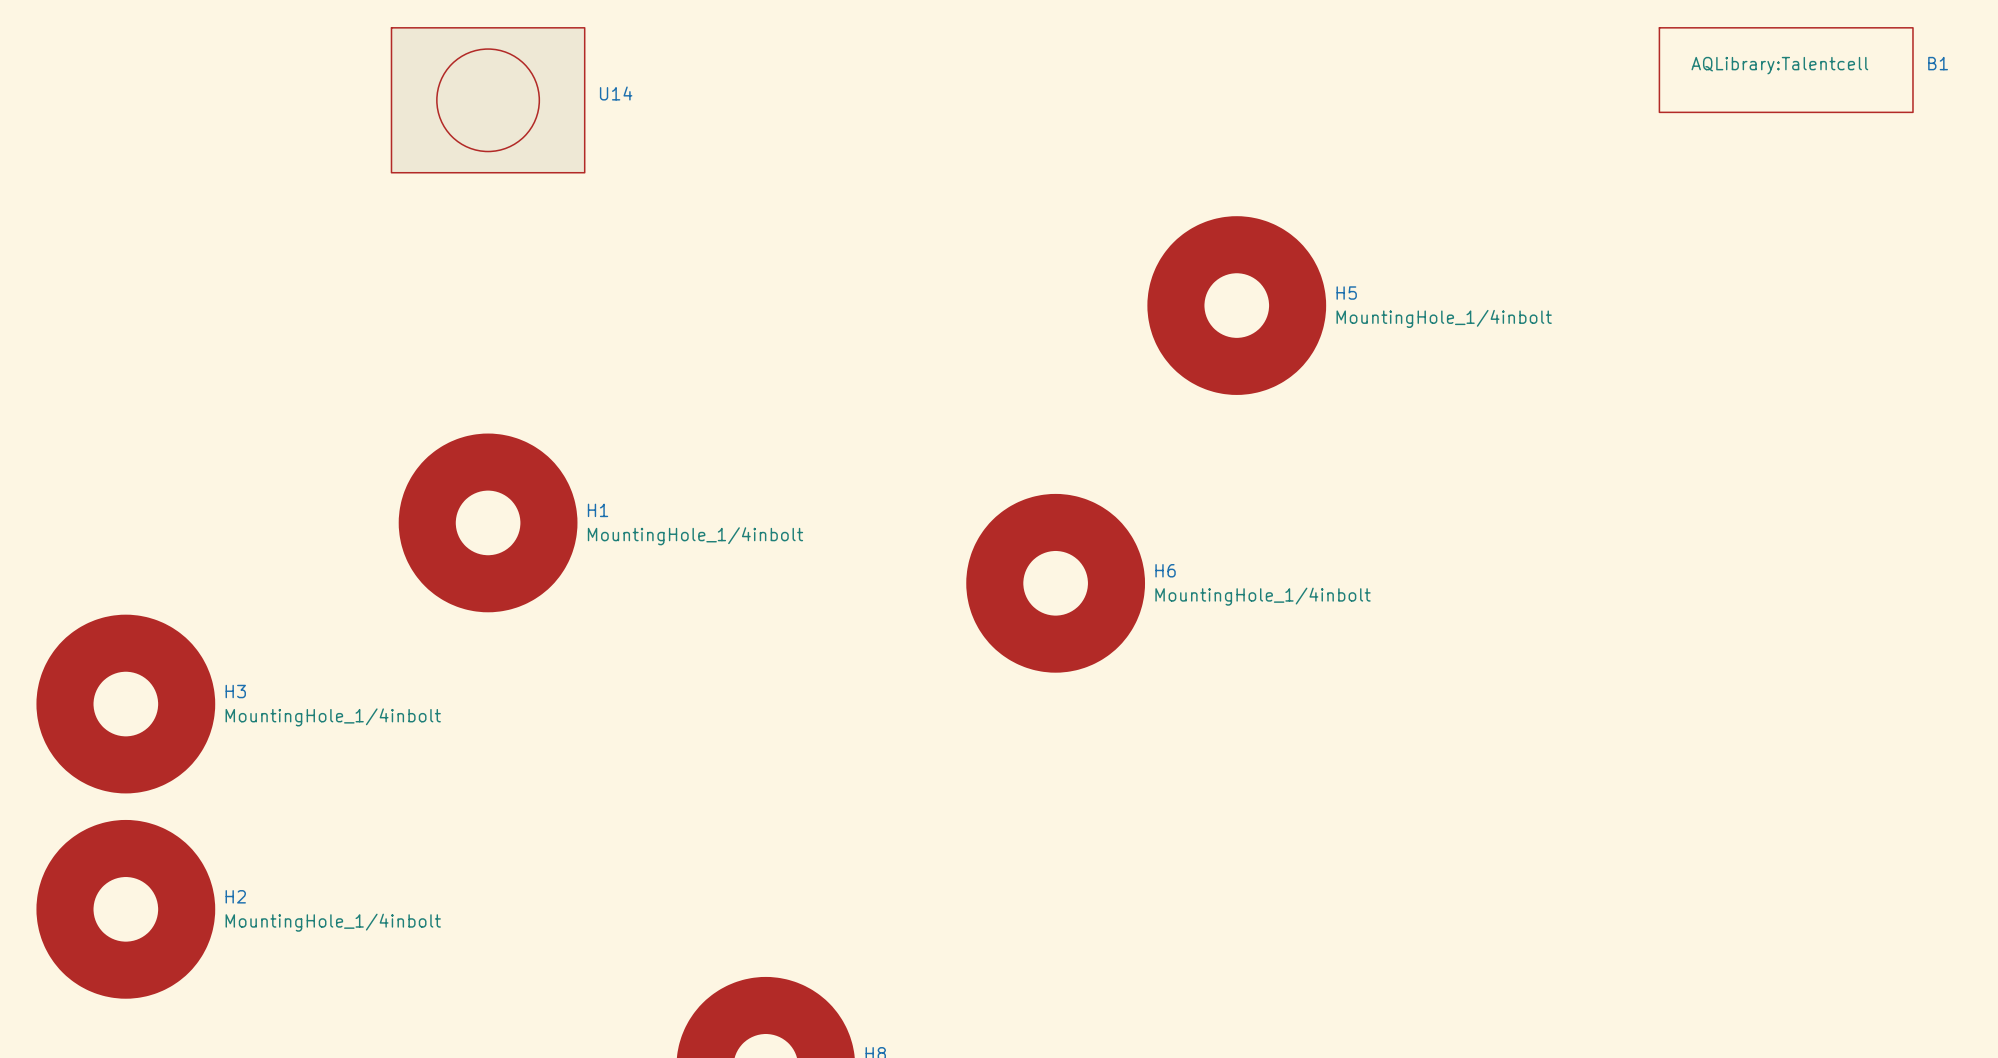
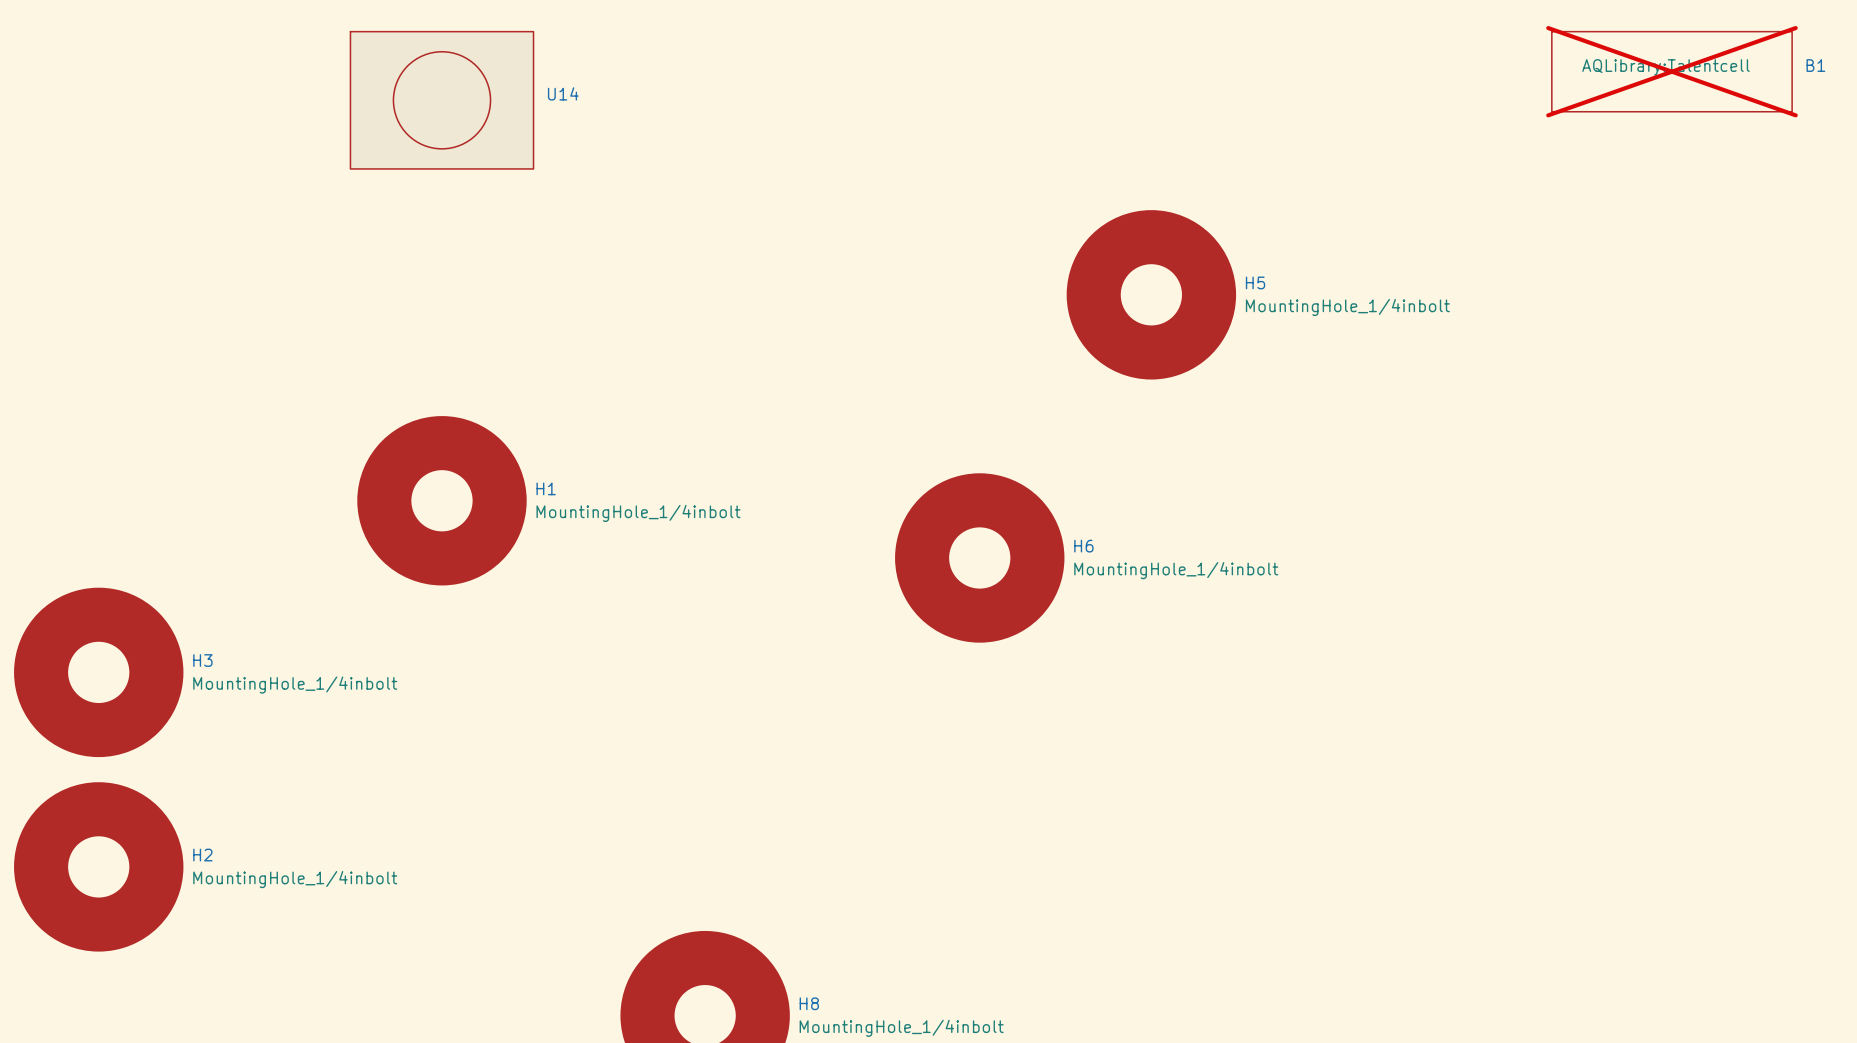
B1 do-not-place cross: none -> (1671, 71)

